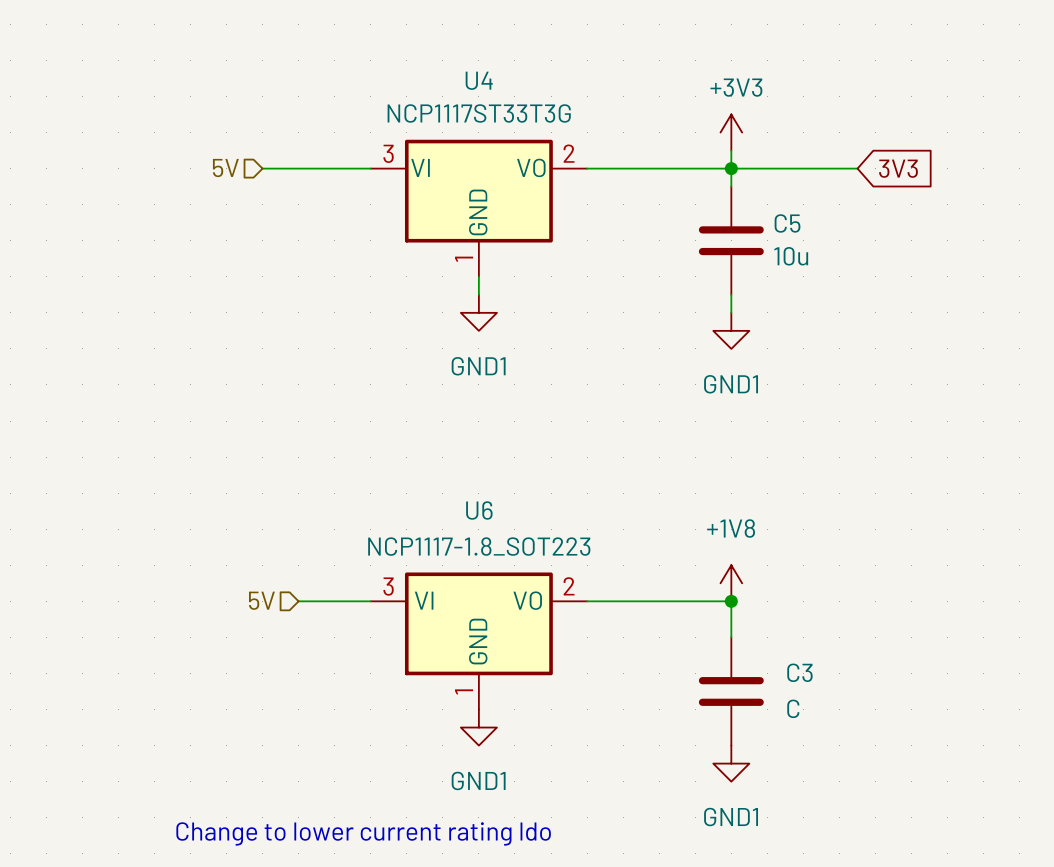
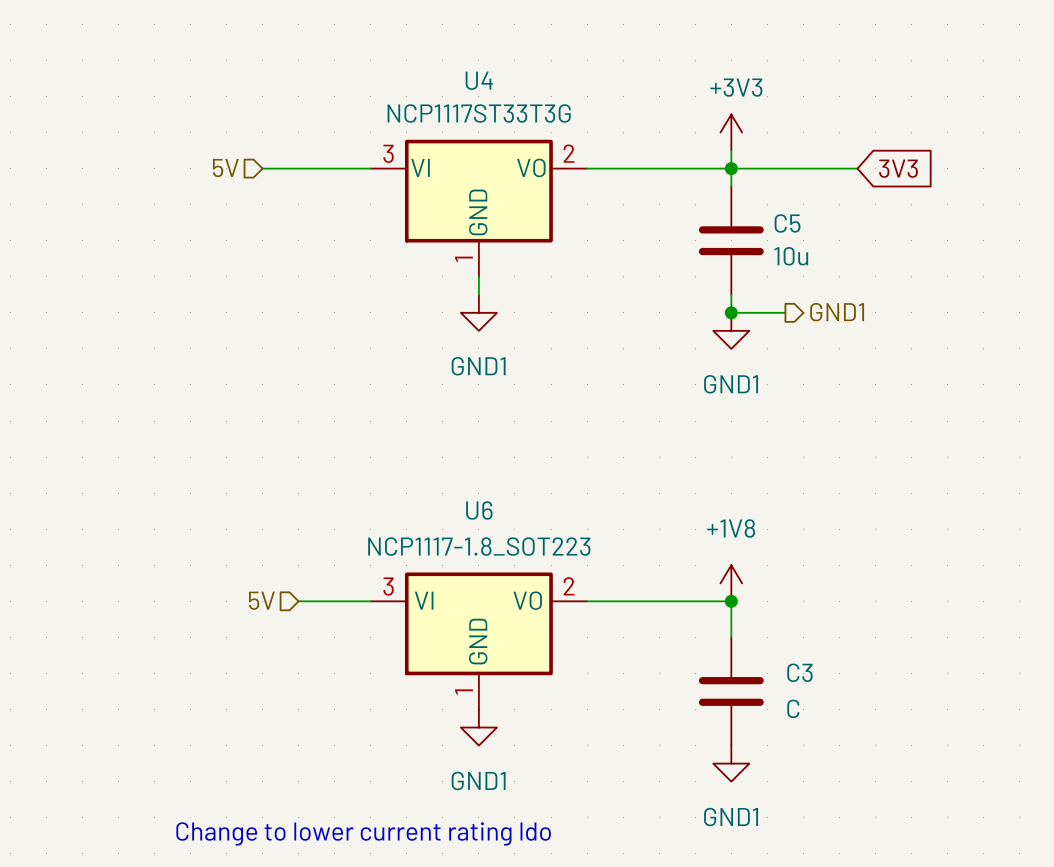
wire: none -> (731, 312) (785, 312)
junction: none -> (731, 312)
hierarchical label: none -> GND1 (837, 312)

